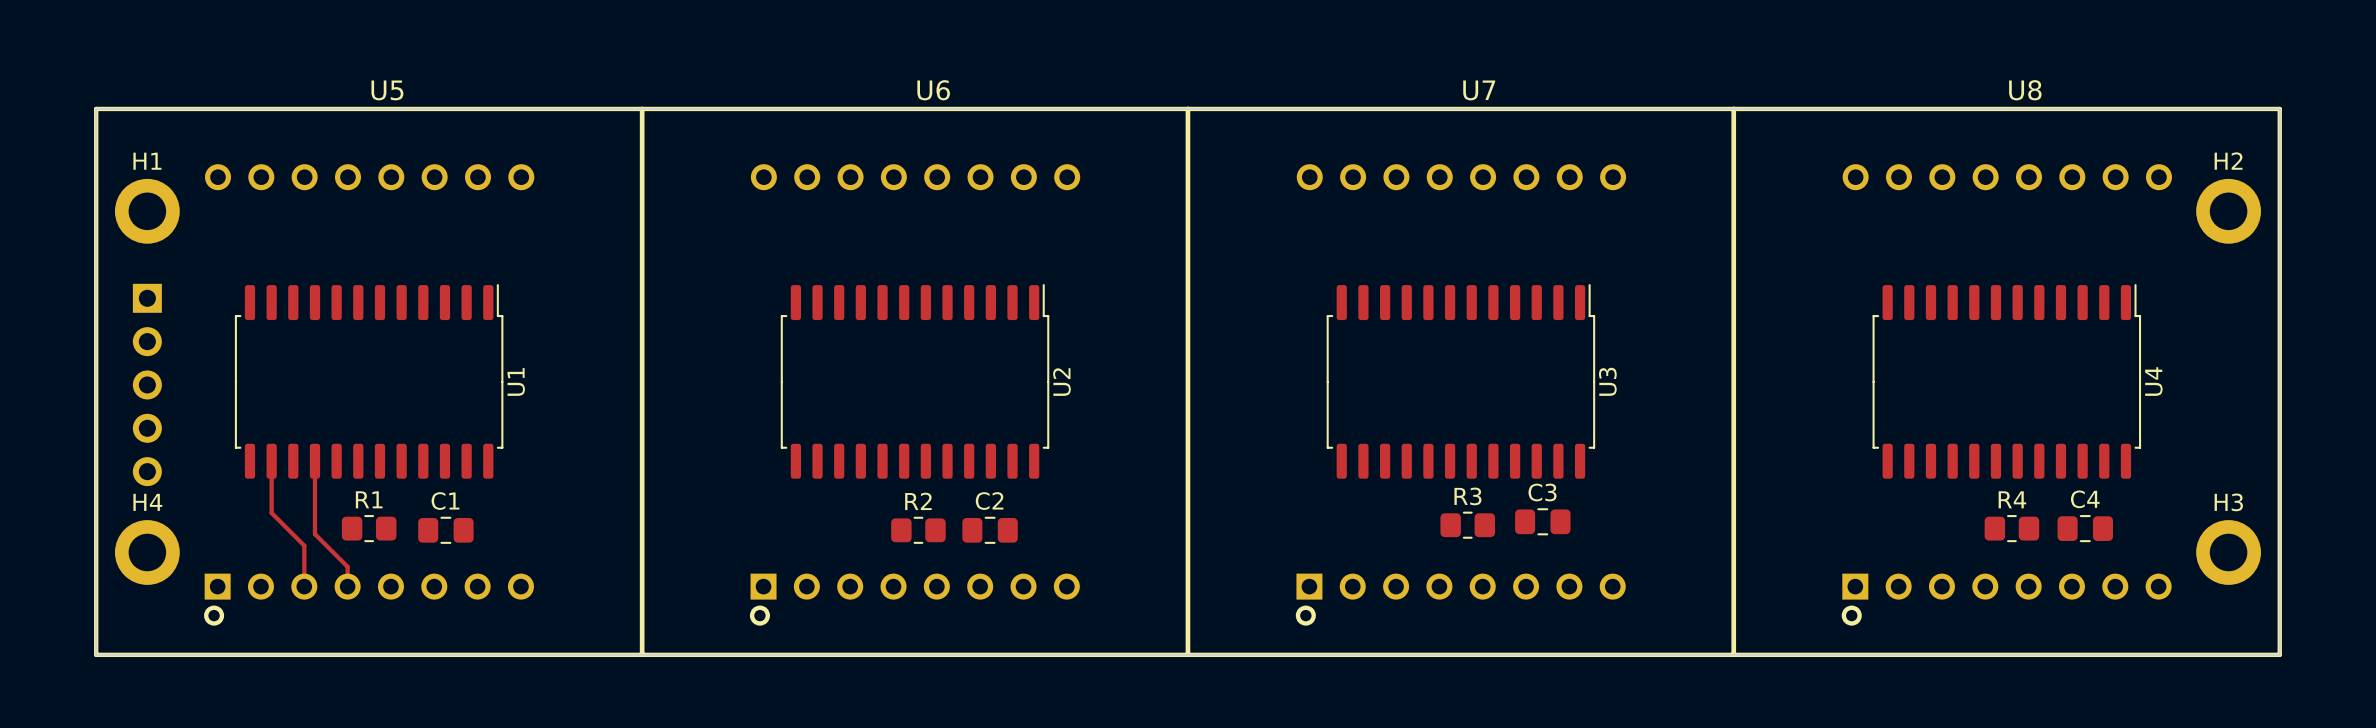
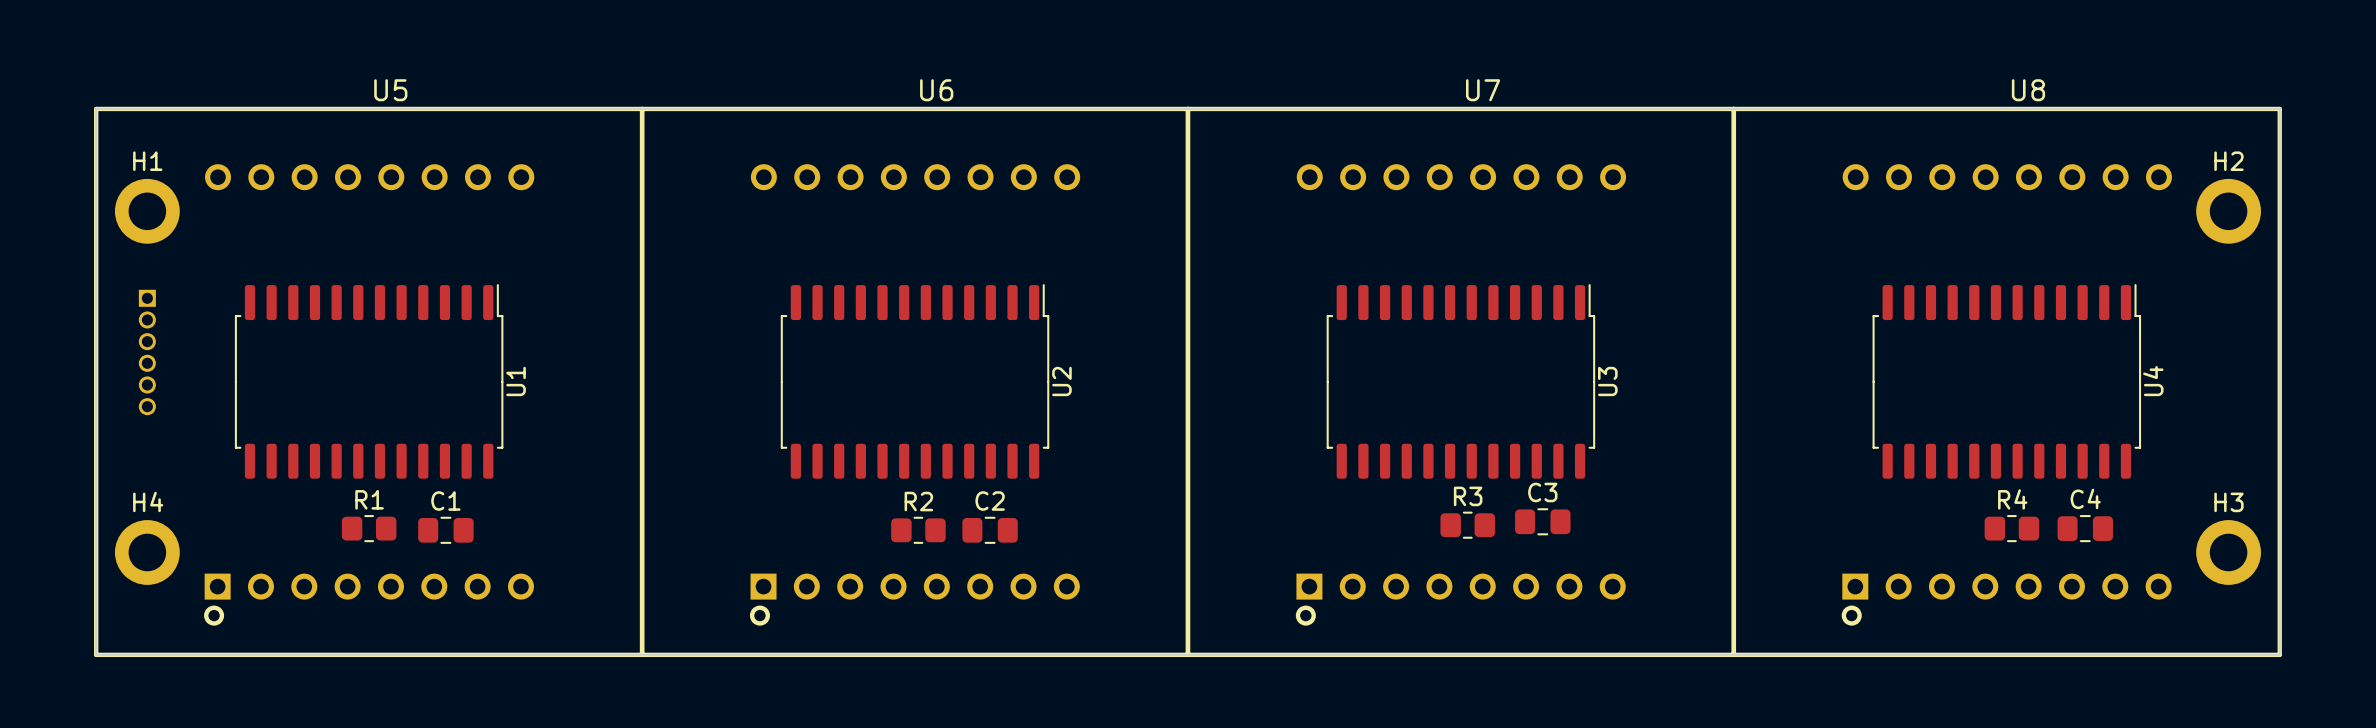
part: none -> (147, 352)
part: (147, 384) -> none
track: (271, 461) (271, 513) (304, 545) (304, 586) -> none
track: (314, 461) (314, 534) (347, 566) (347, 586) -> none

